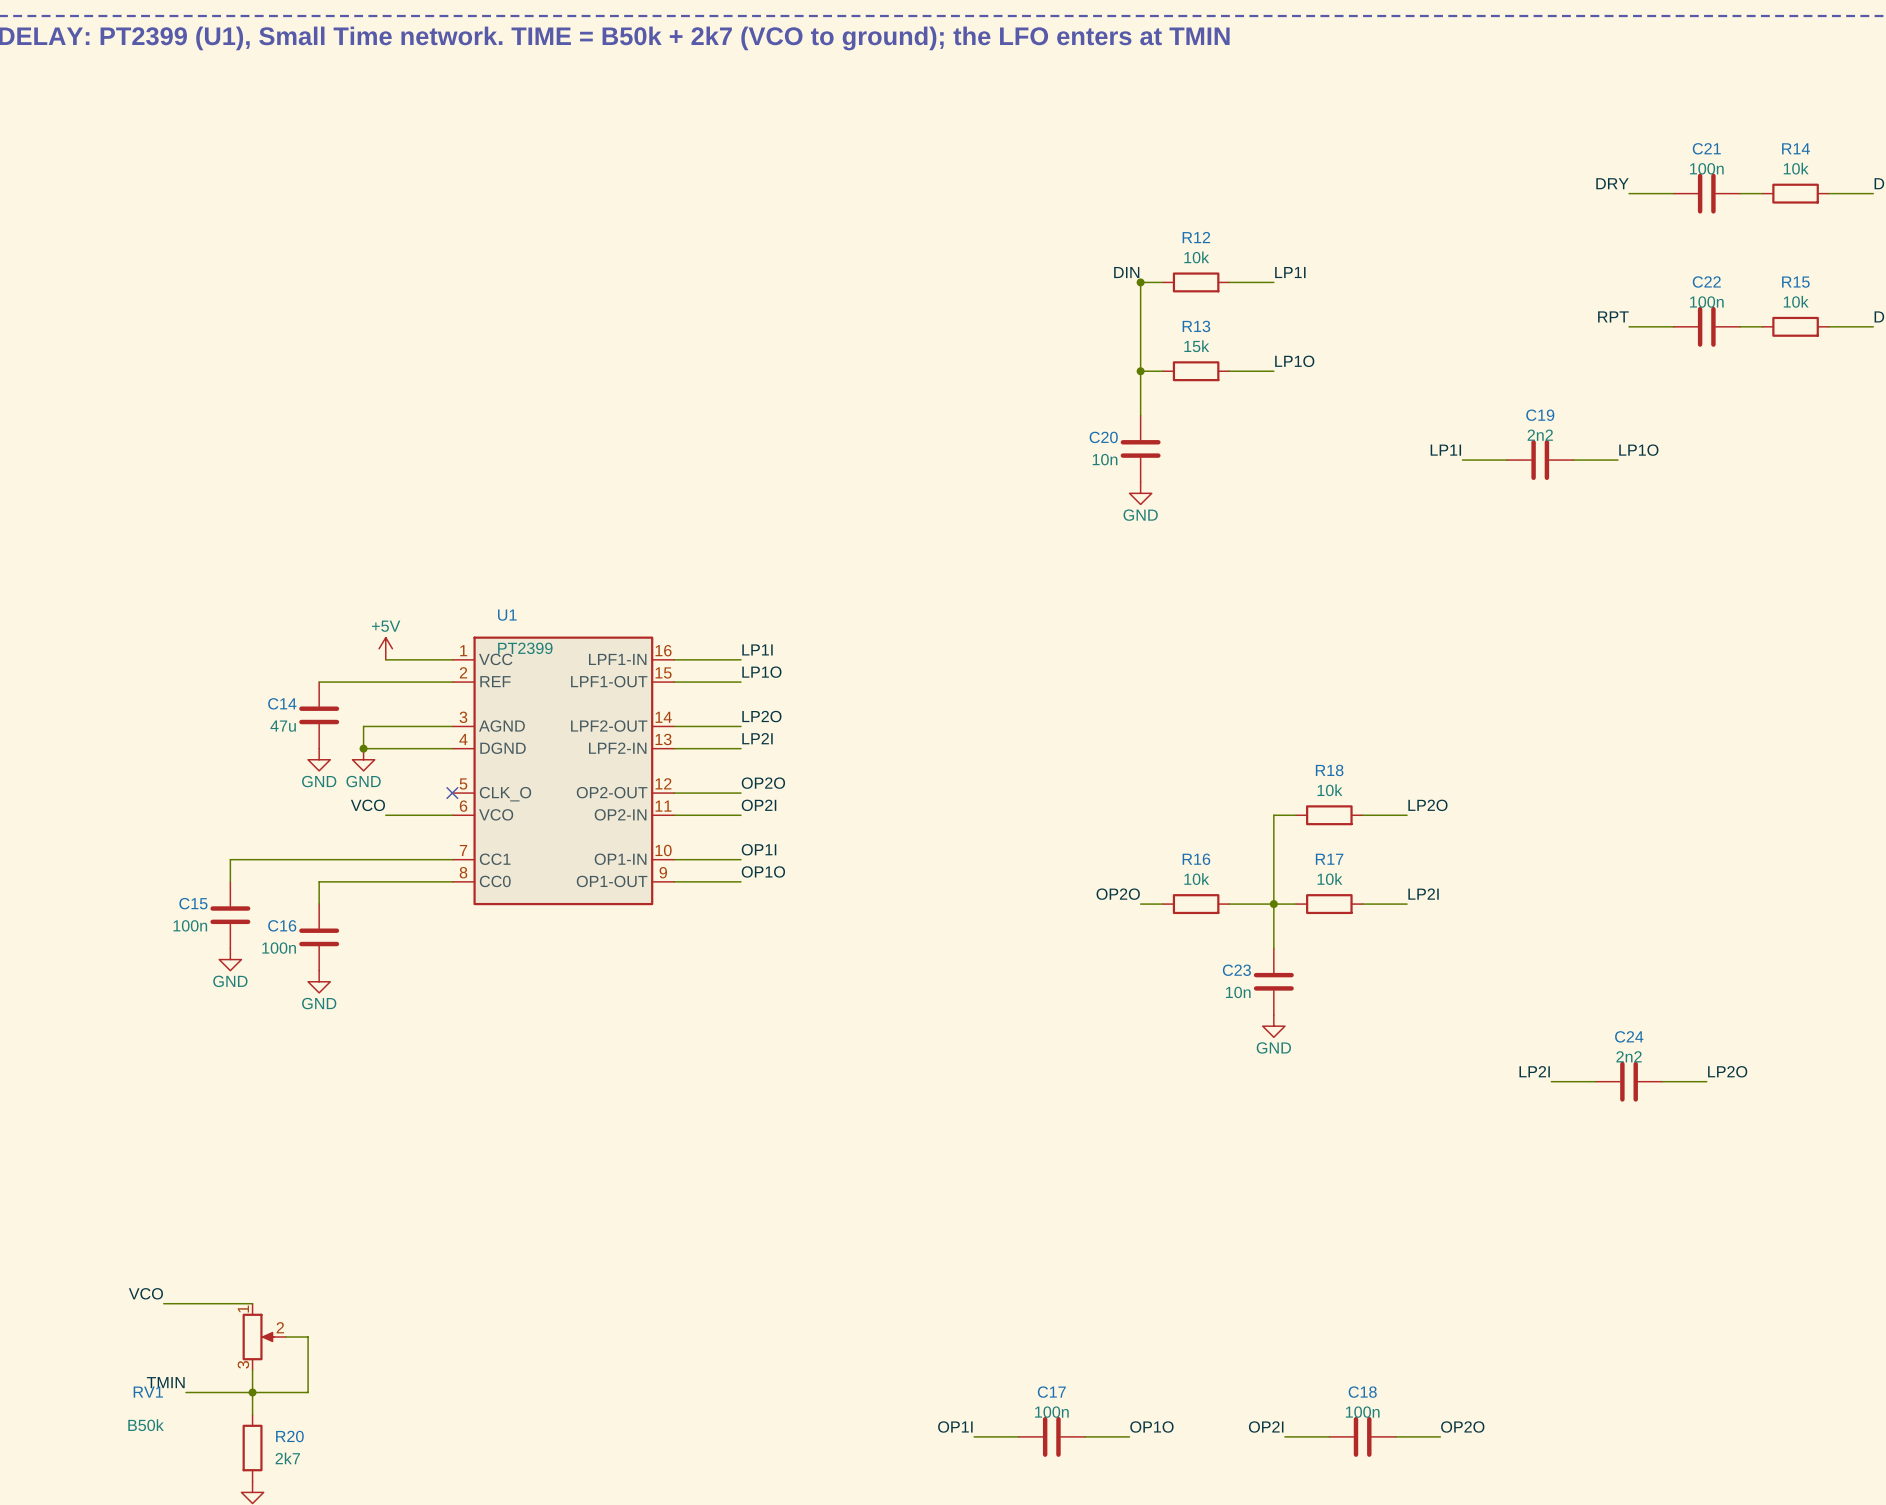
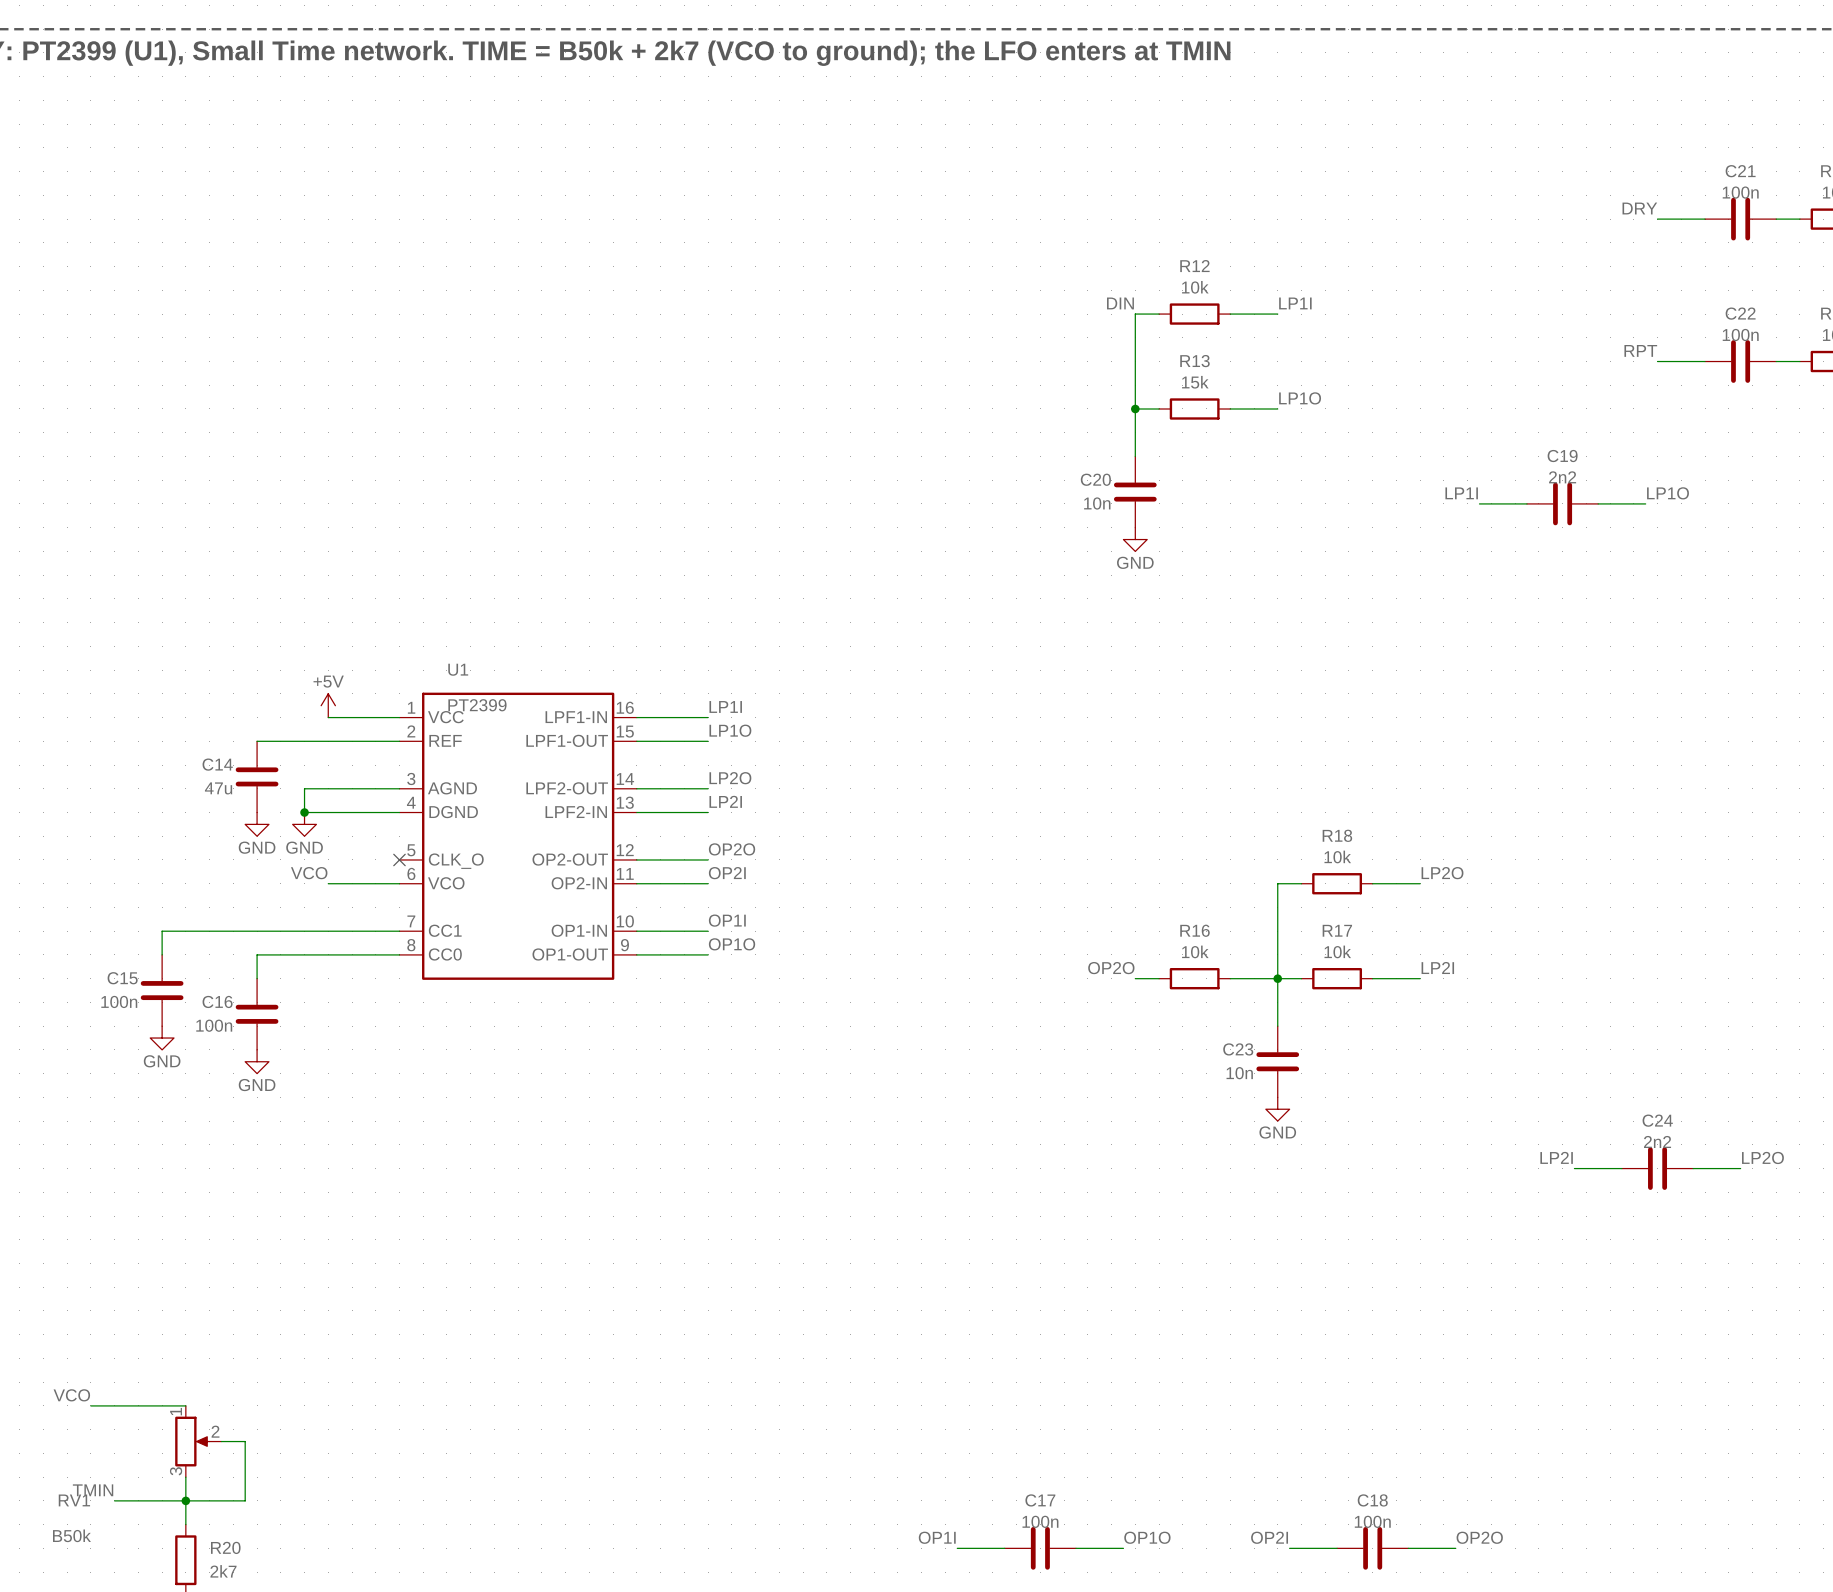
junction: (1140, 282) -> none

